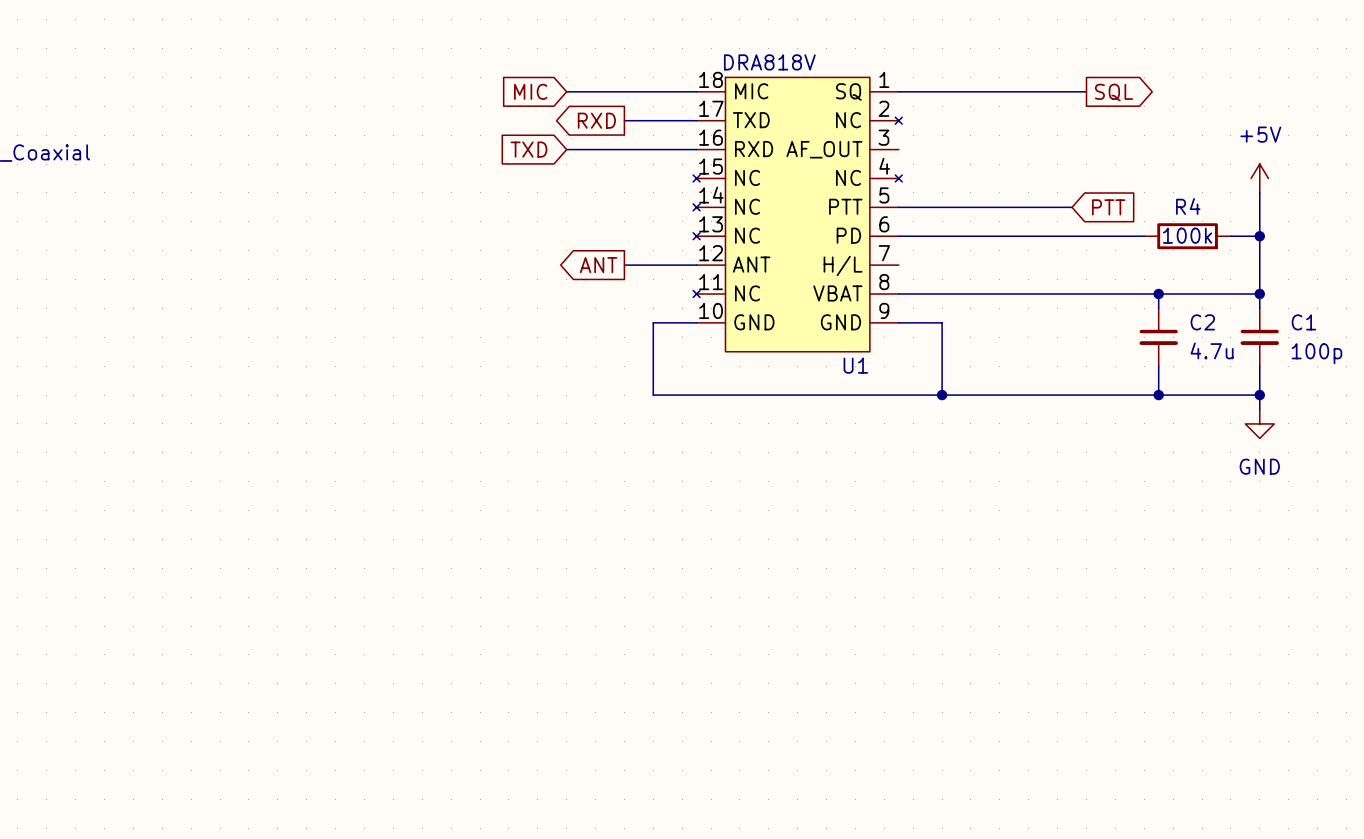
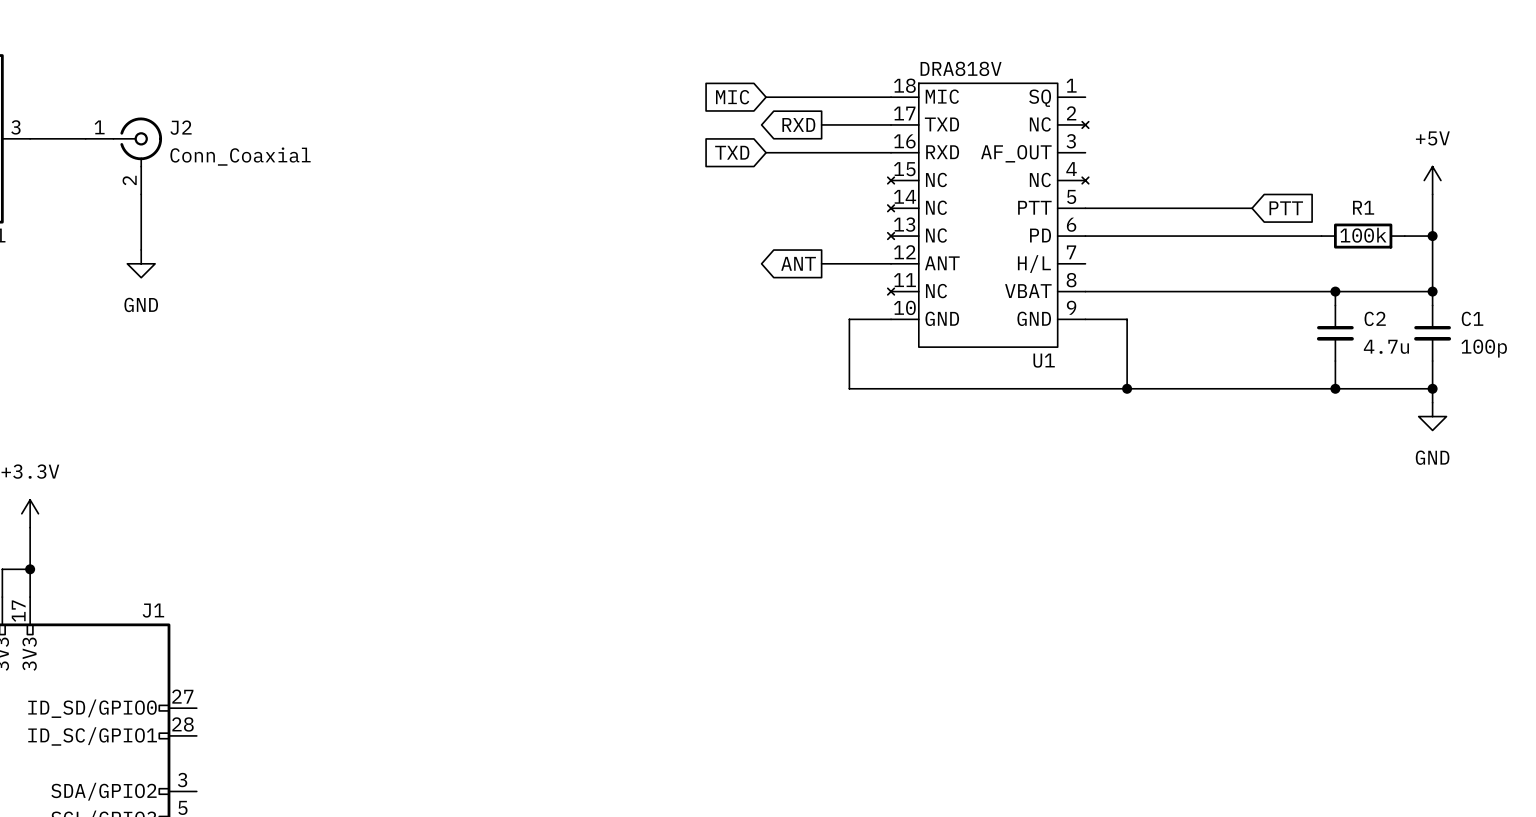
wire: (898, 91) (1086, 91) -> none
global label: SQL (1114, 92) -> none
R4 name: R4 (1188, 206) -> R1 (1363, 207)

